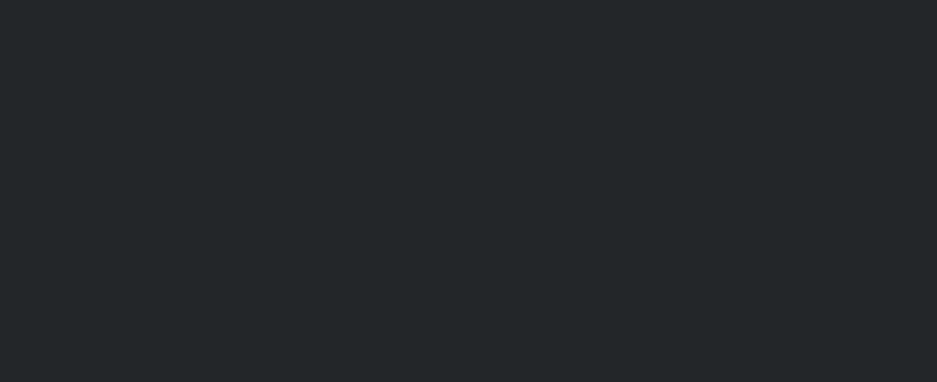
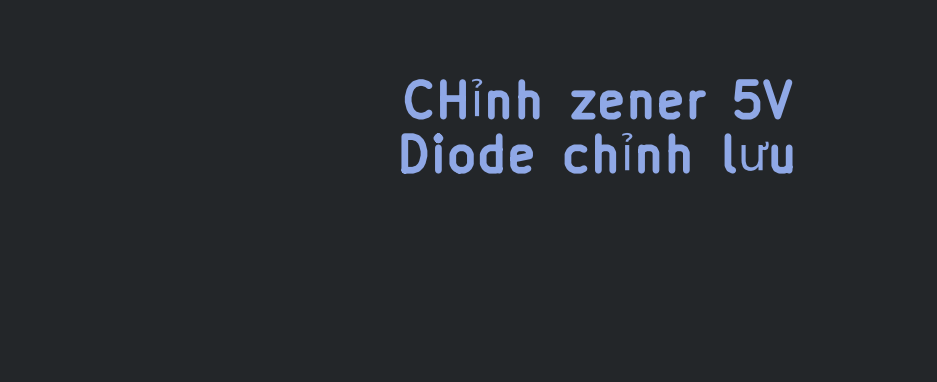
text: none -> CHỉnh zener 5V (598, 97)
text: none -> Diode chỉnh lưu (596, 151)

